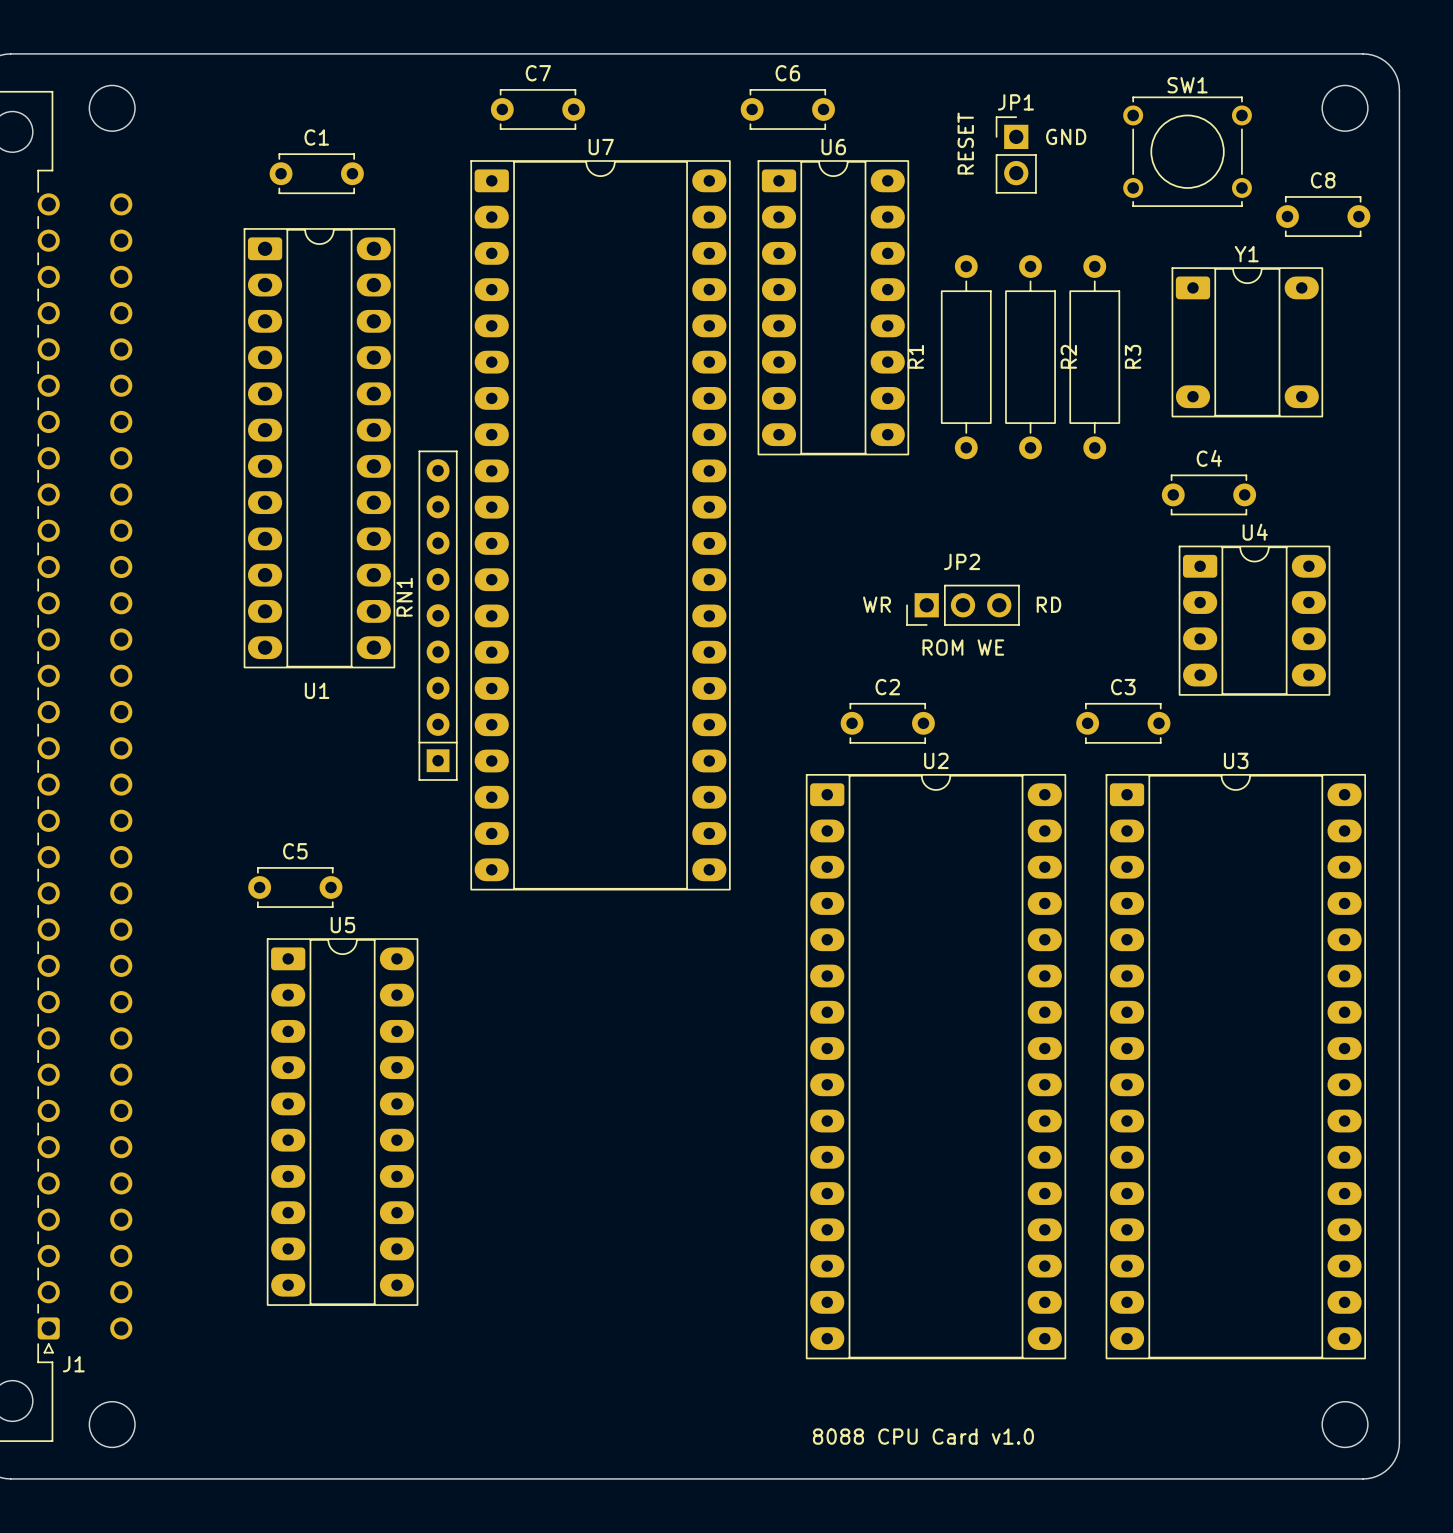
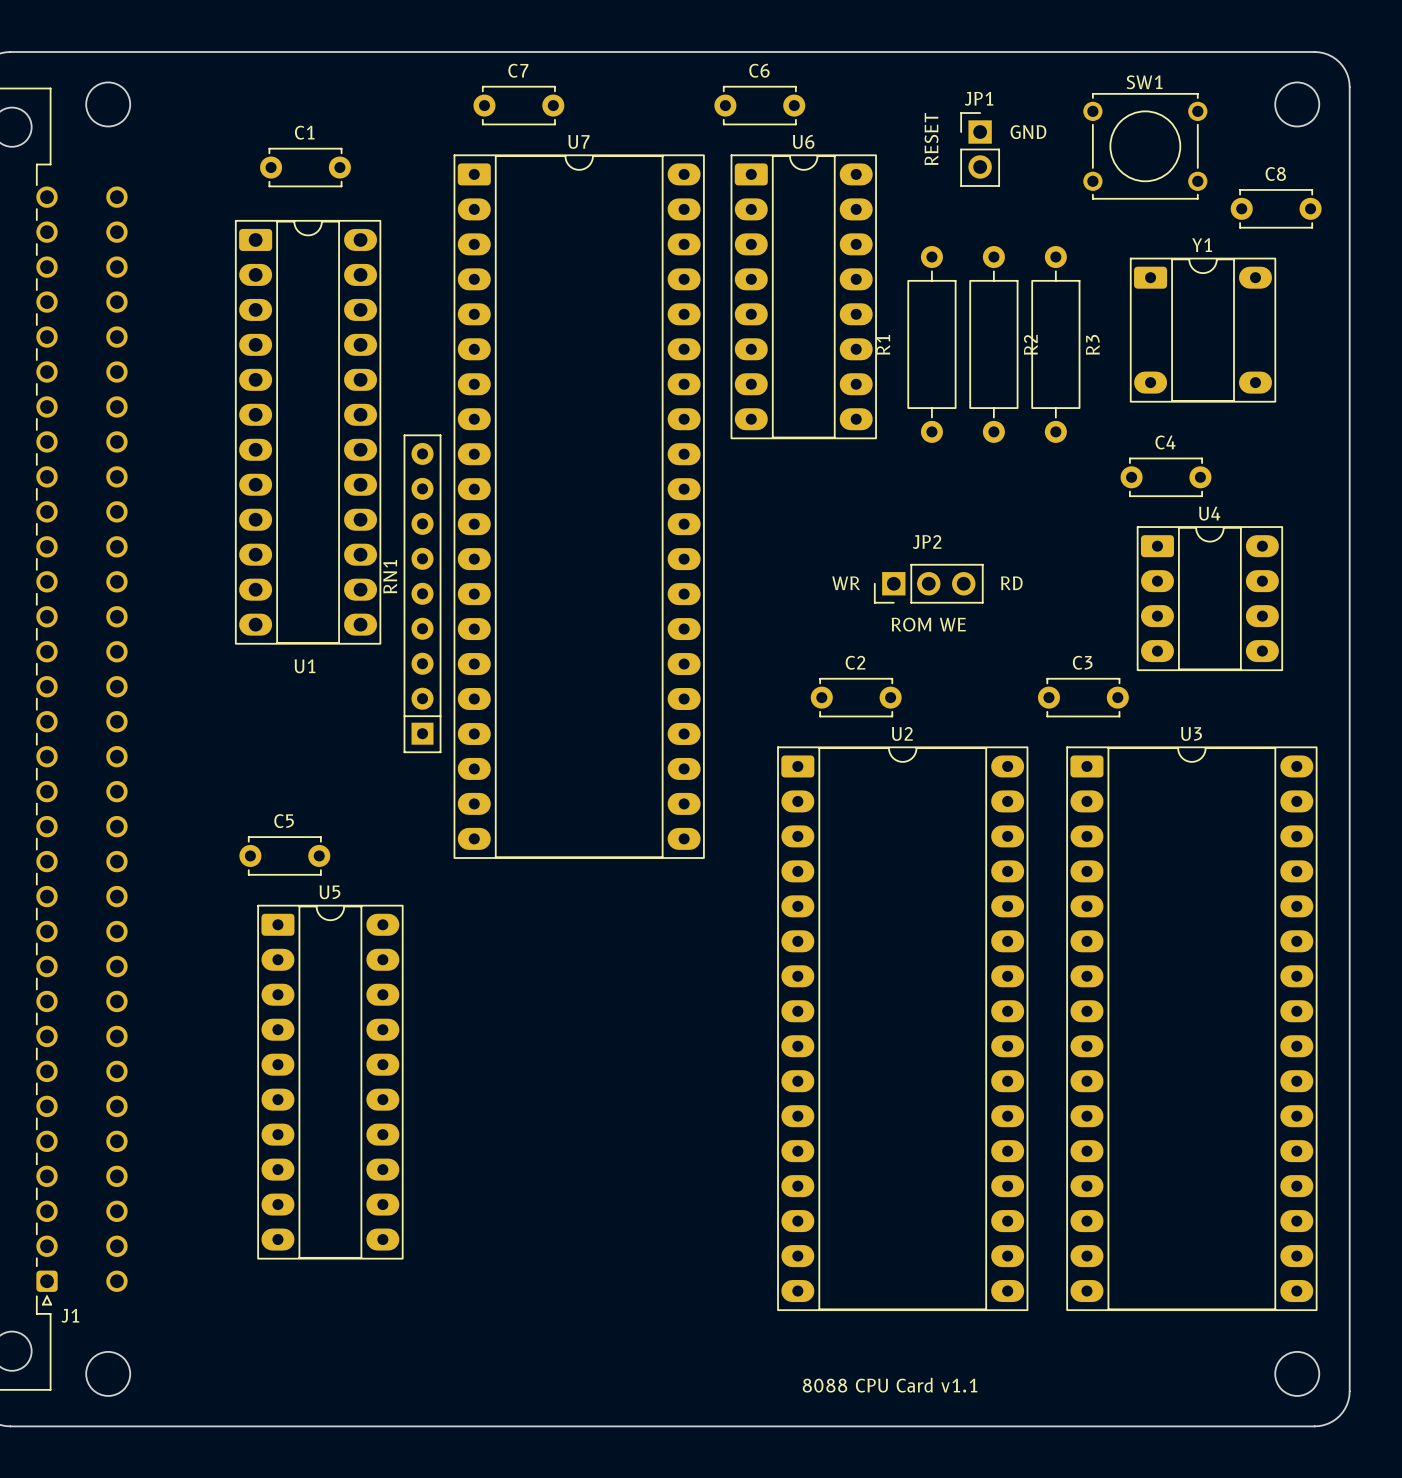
text: 8088 CPU Card v1.0 (923, 1436) -> 8088 CPU Card v1.1 (890, 1385)

